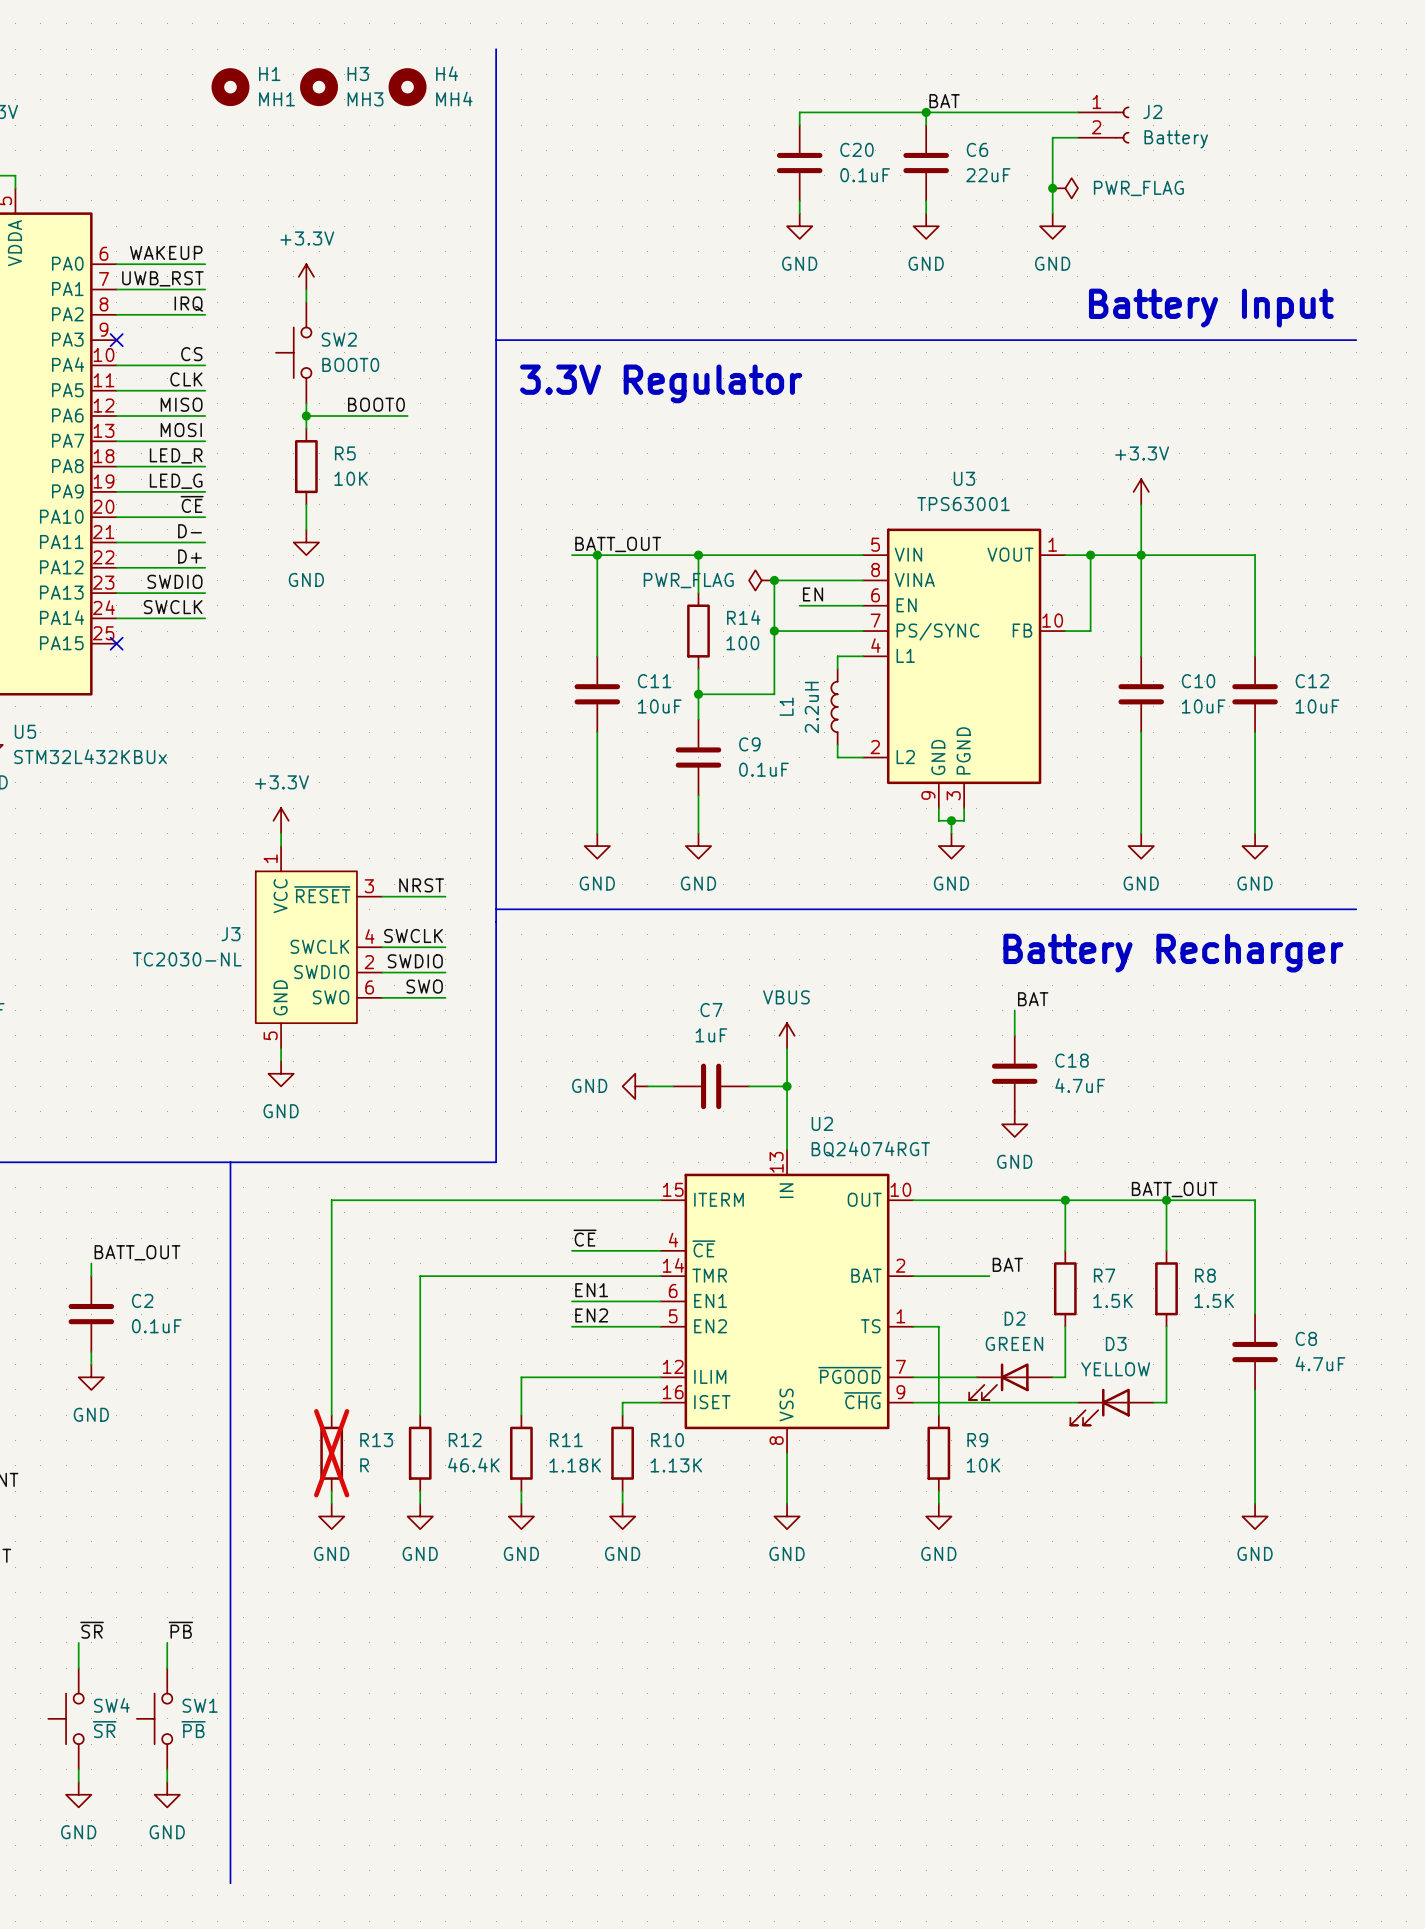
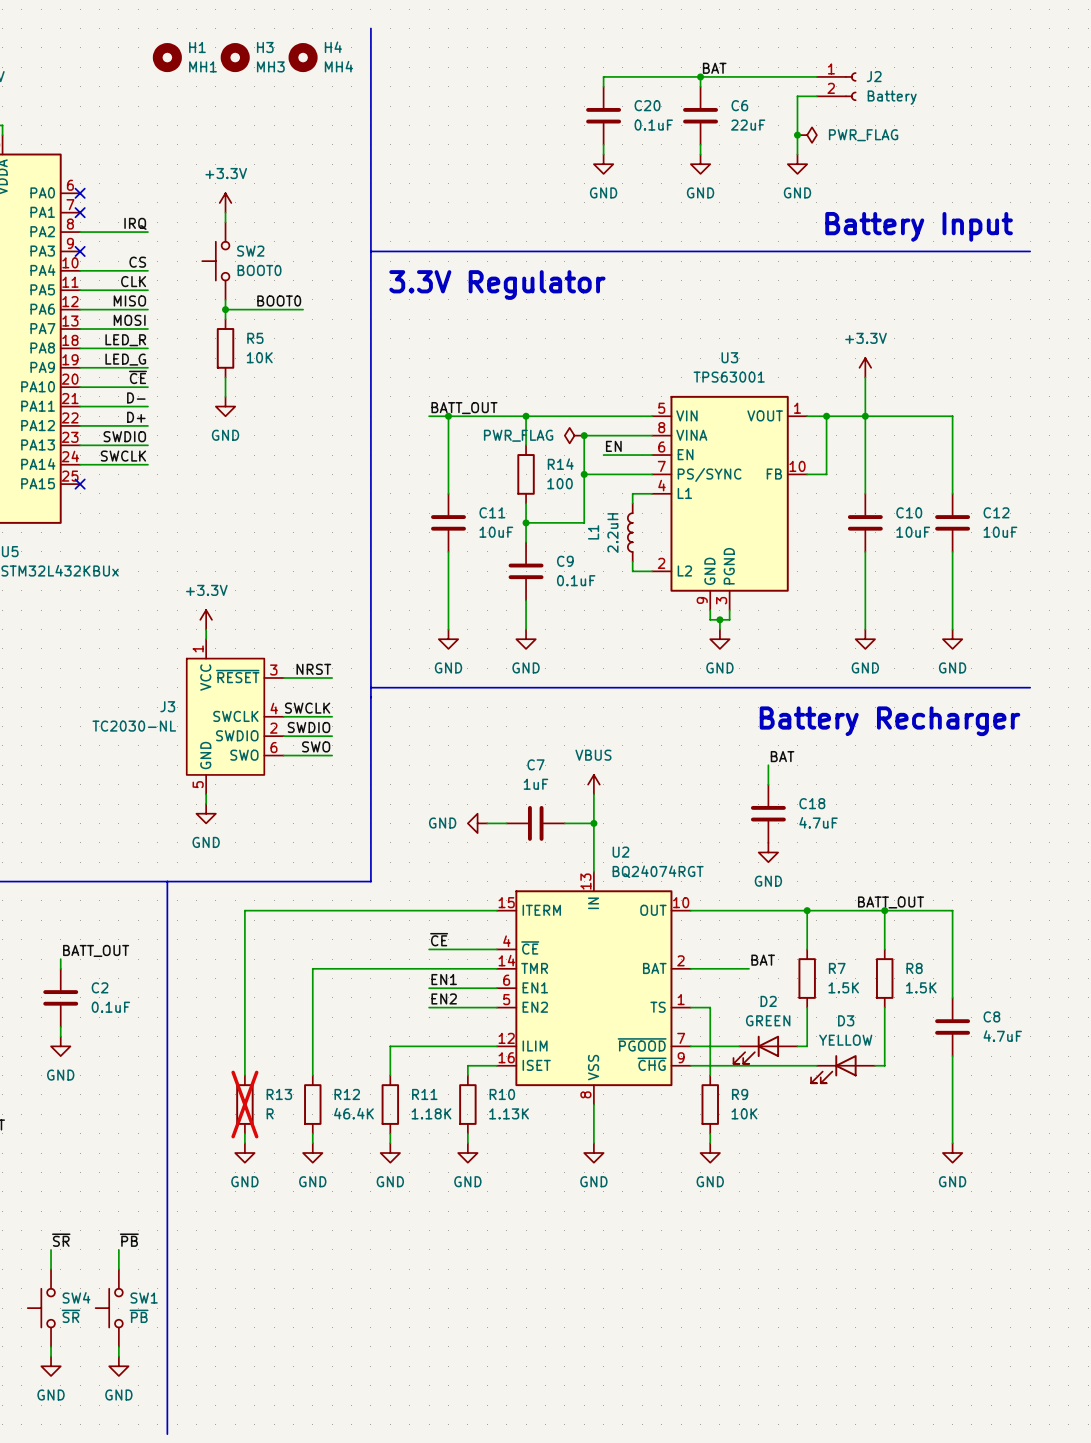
label: WAKEUP (166, 252) -> none
wire: (116, 264) (205, 264) -> none
no-connect mark: none -> (80, 193)
label: UWB_RST (162, 278) -> none
wire: (116, 289) (205, 289) -> none
no-connect mark: none -> (80, 212)

